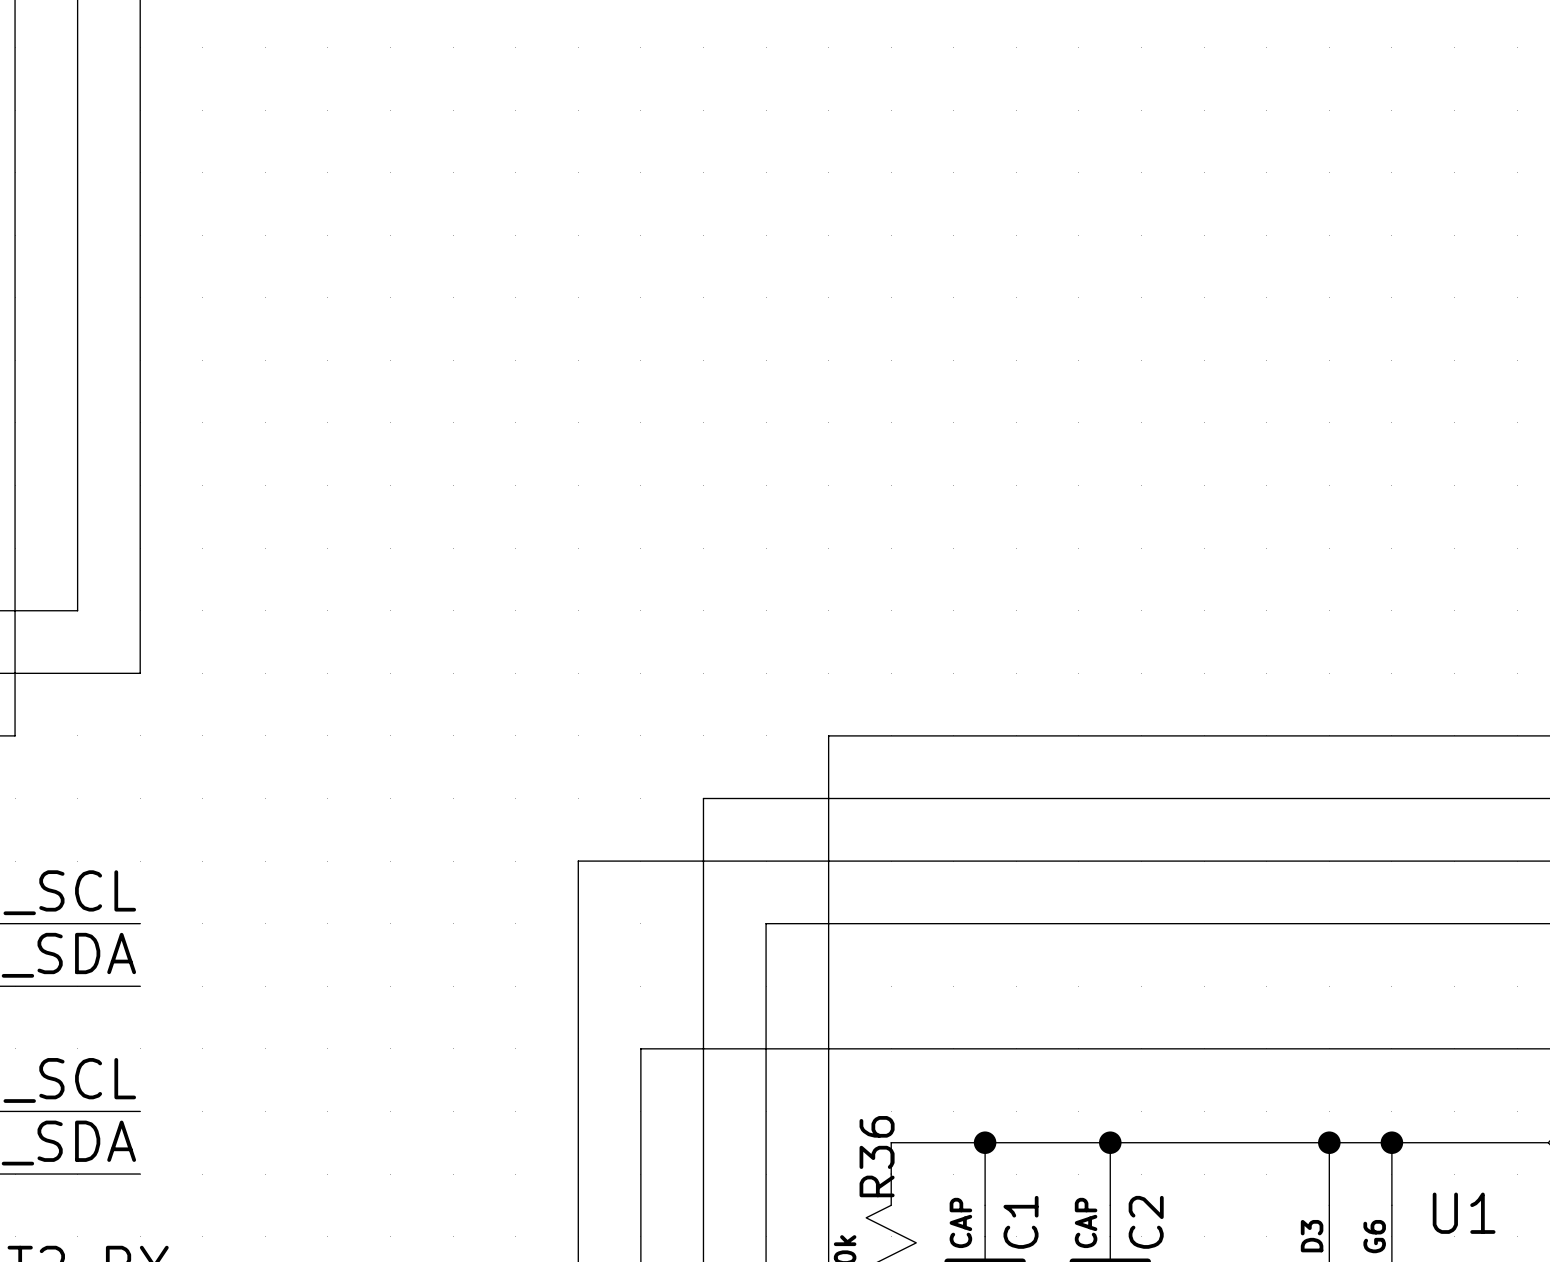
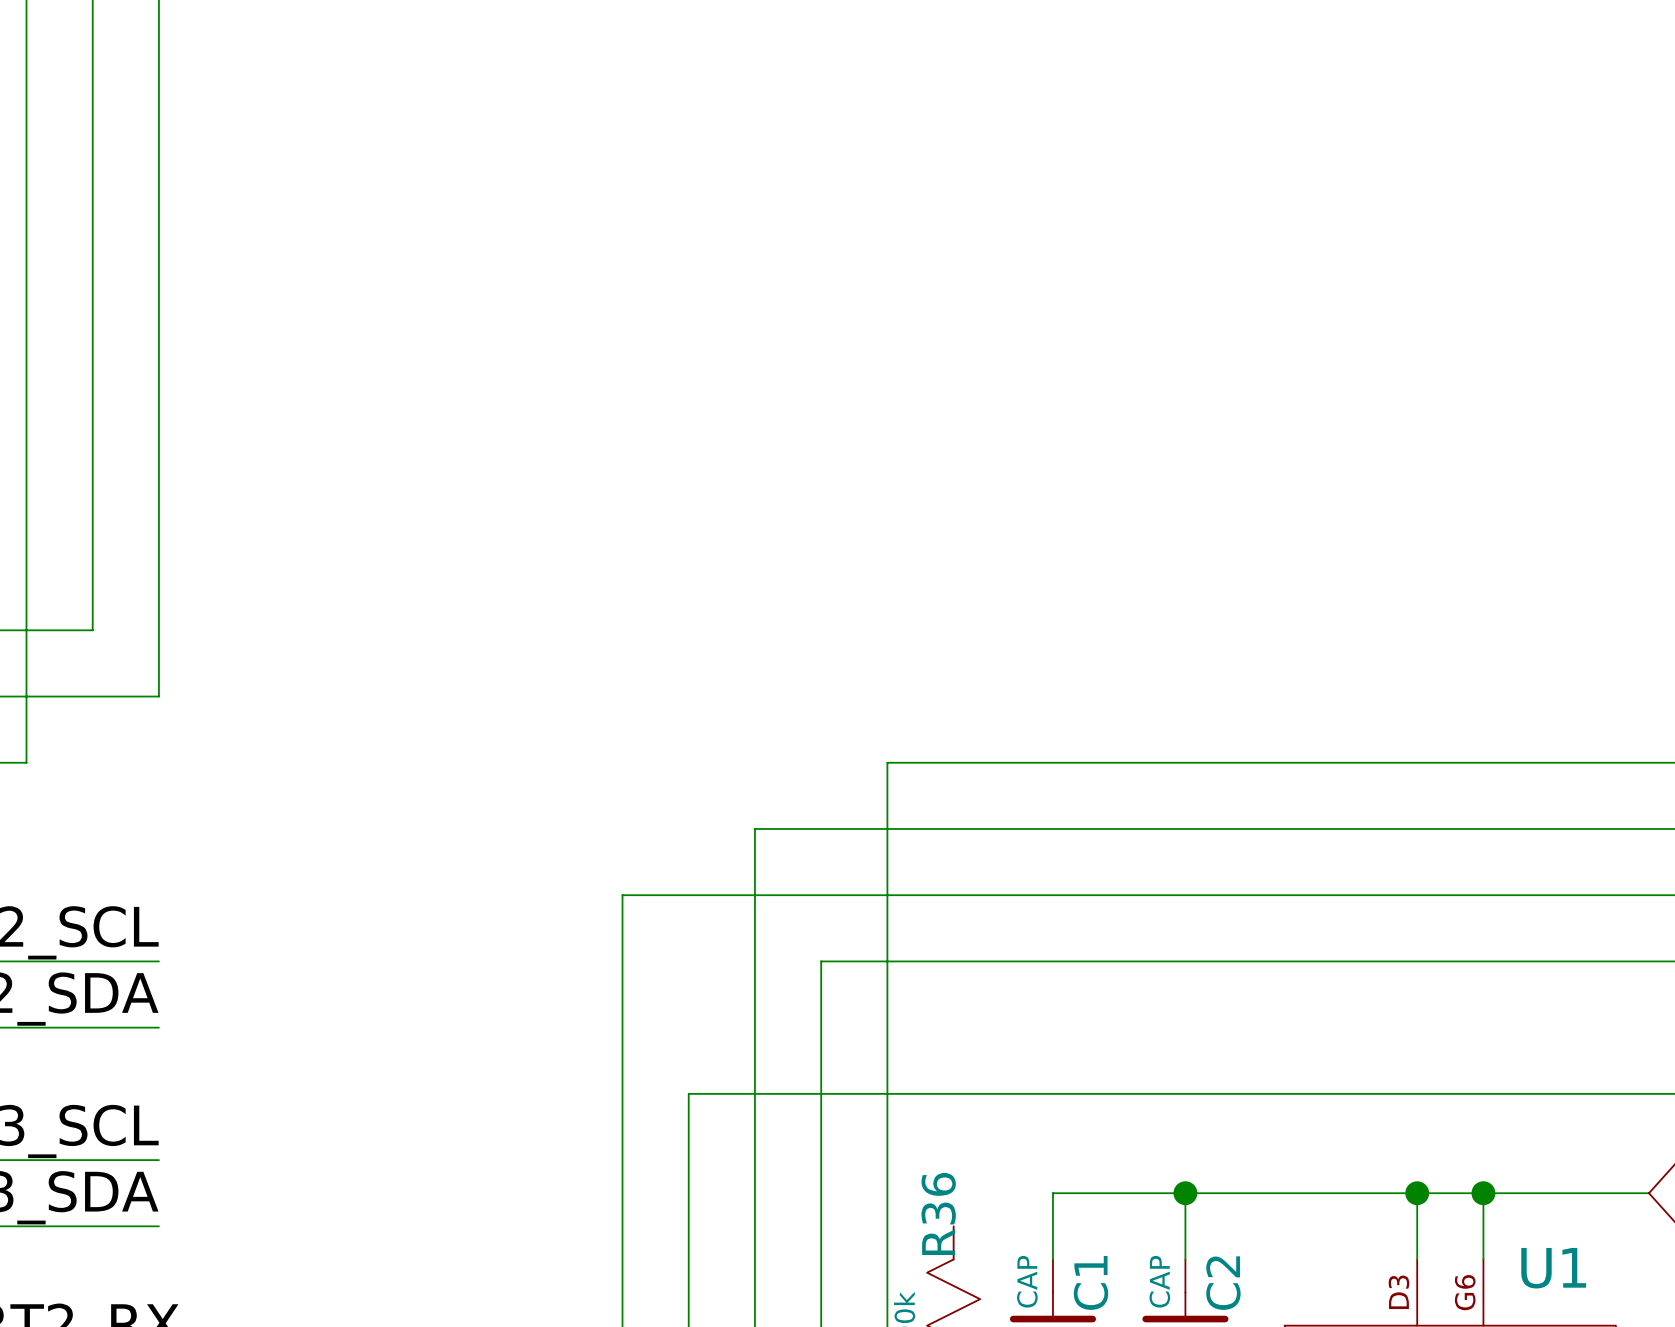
wire: (985, 1142) (891, 1142) (891, 1174) -> none
junction: (985, 1142) -> none

